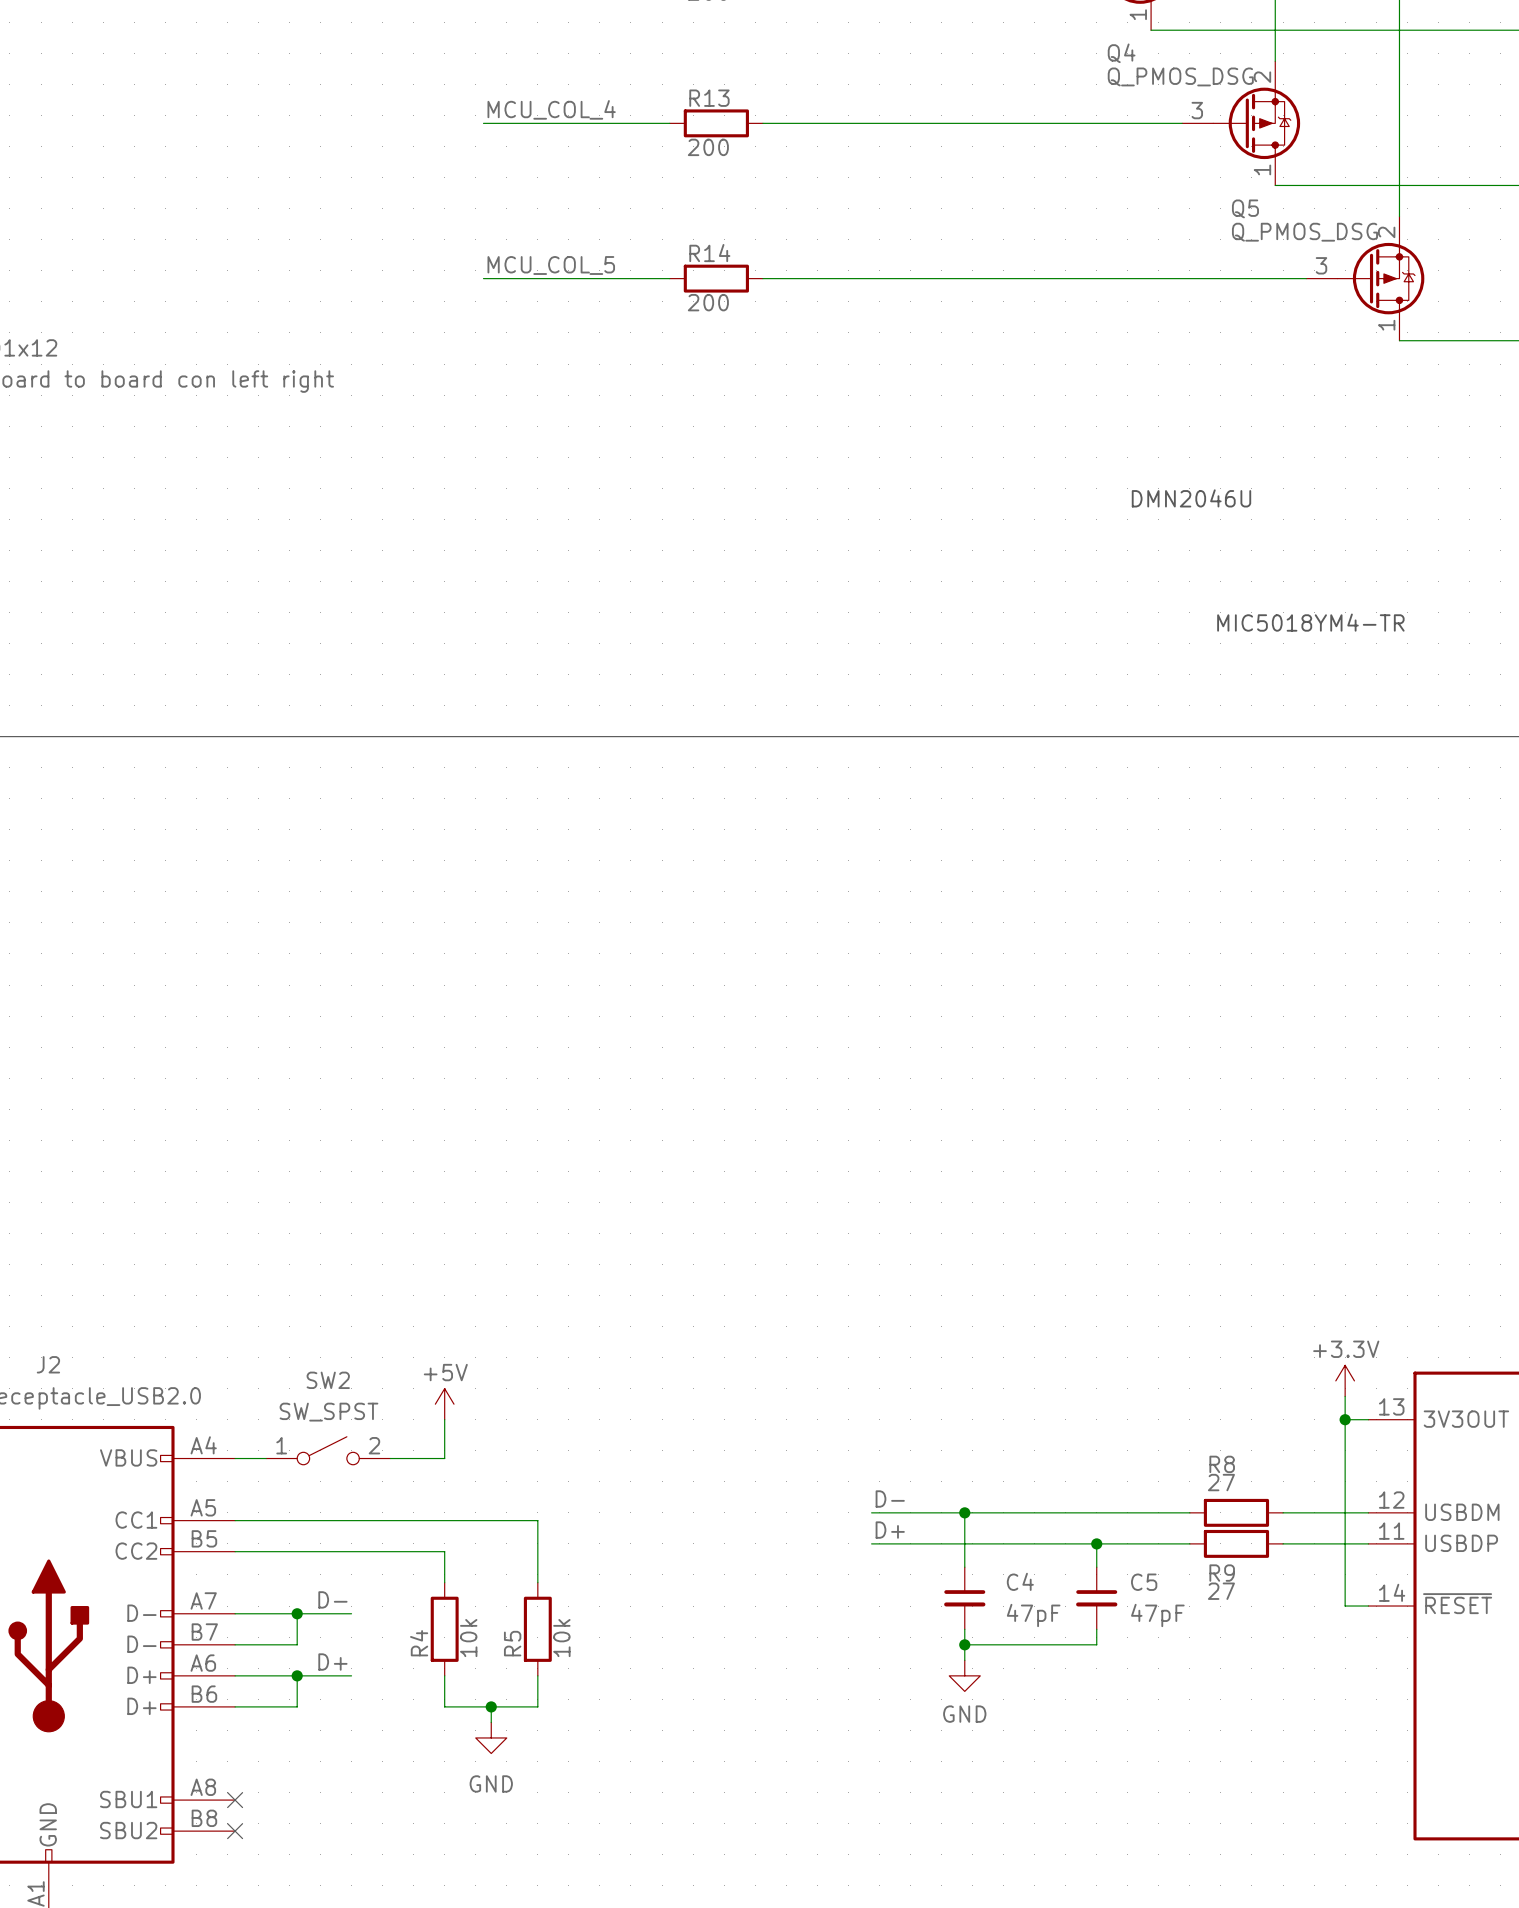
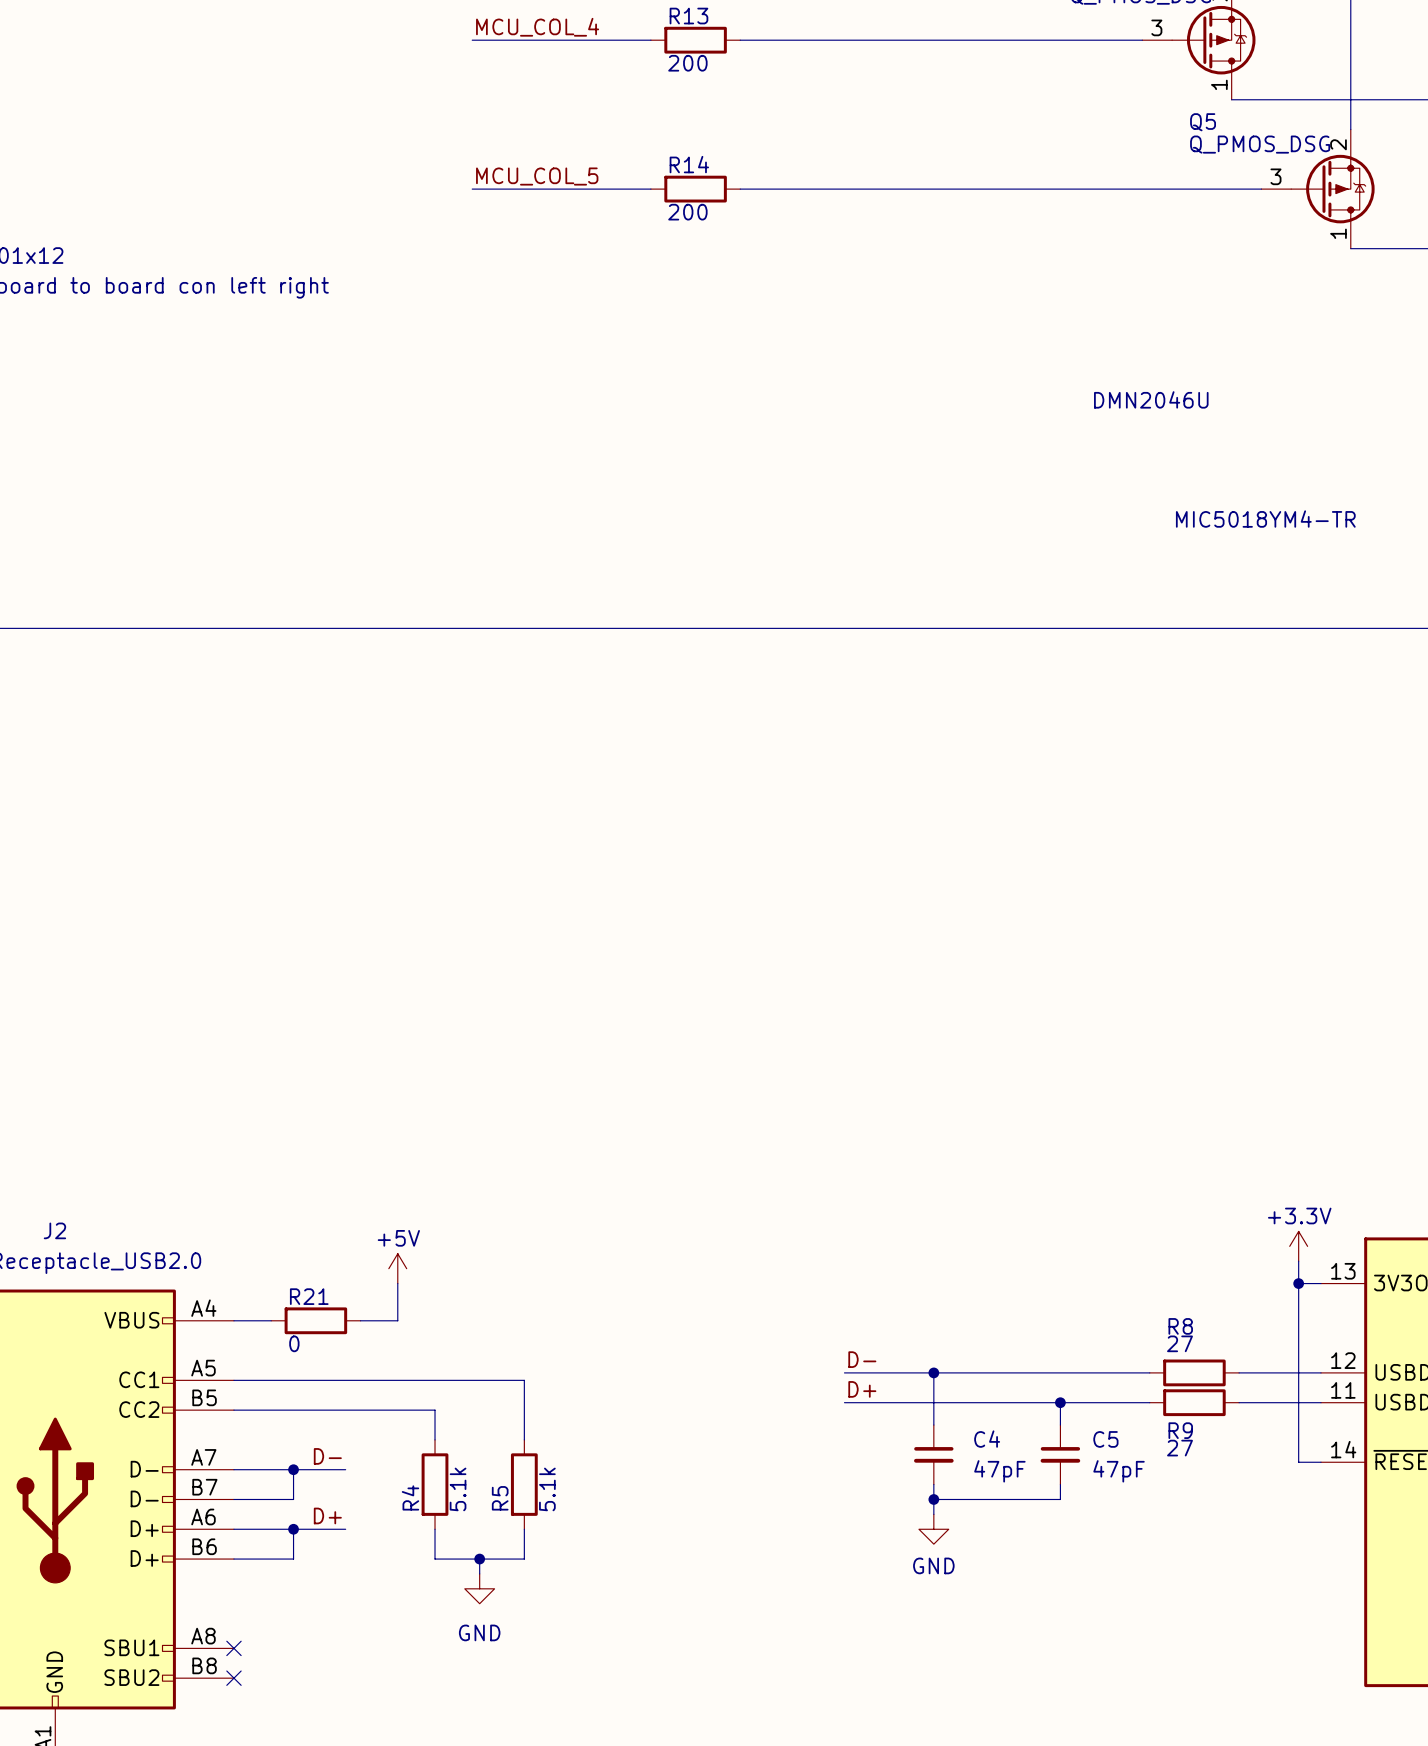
power symbol position: +5V (444, 1404) -> +5V (397, 1268)
wire: (444, 1419) (444, 1458) (405, 1458) -> (397, 1283) (397, 1320)
SW2: SW_SPST (328, 1450) -> none
R21: none -> 0 (315, 1320)
R4 value: 10k (468, 1638) -> 5.1k (458, 1489)
R5 value: 10k (561, 1638) -> 5.1k (547, 1489)

